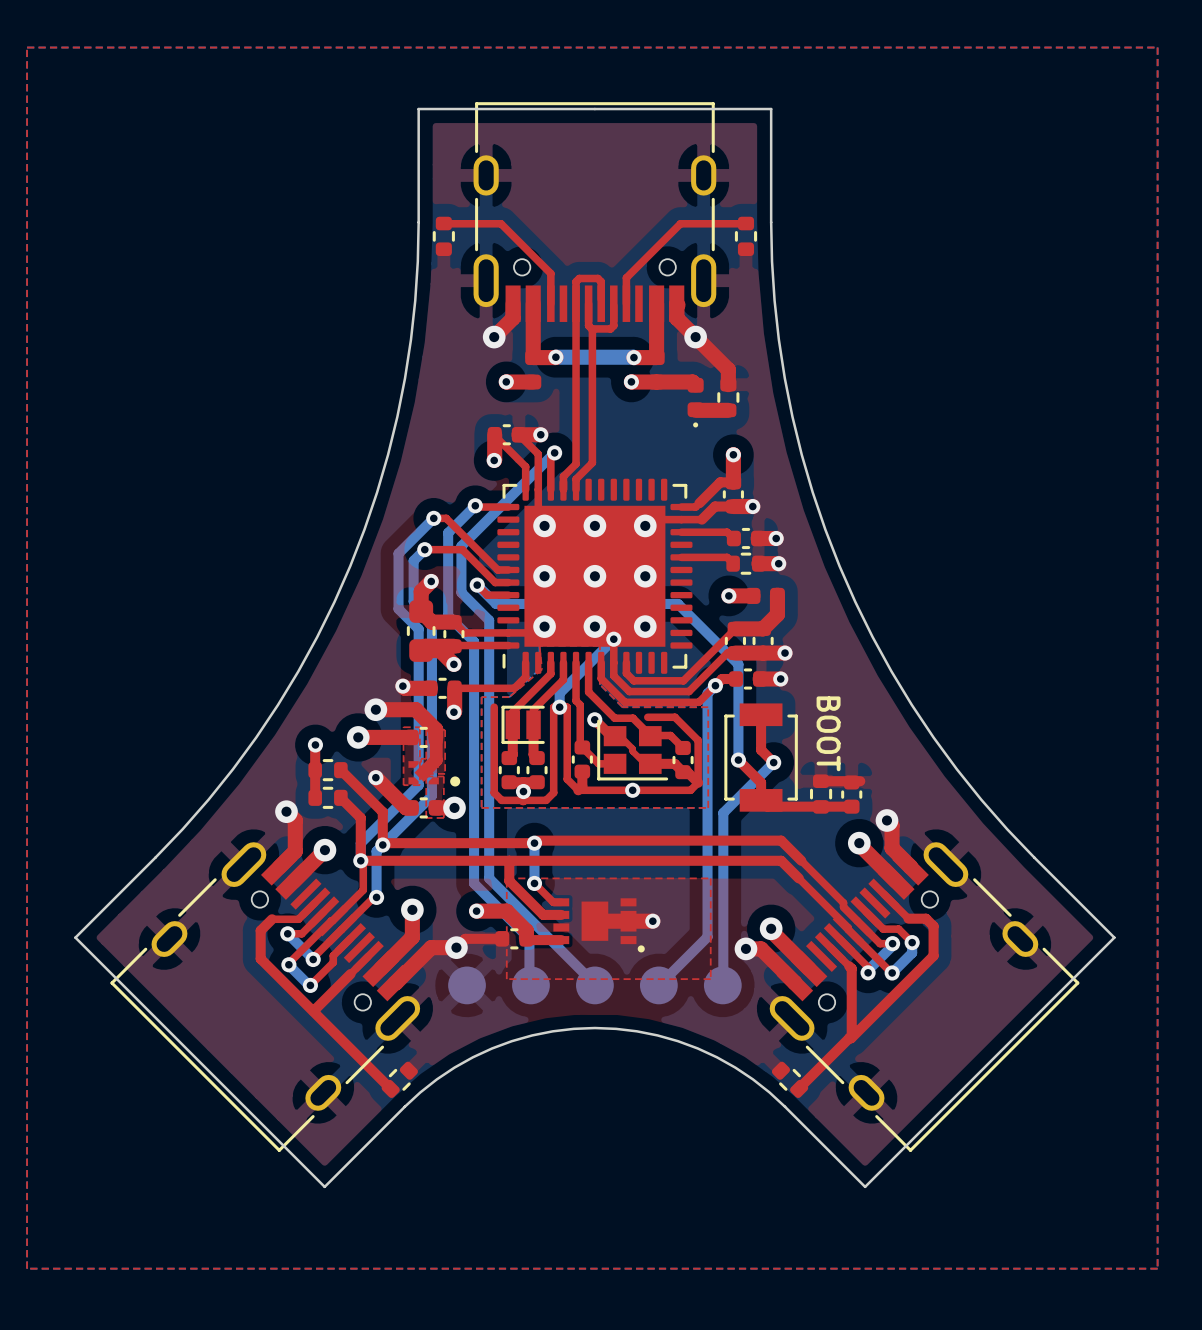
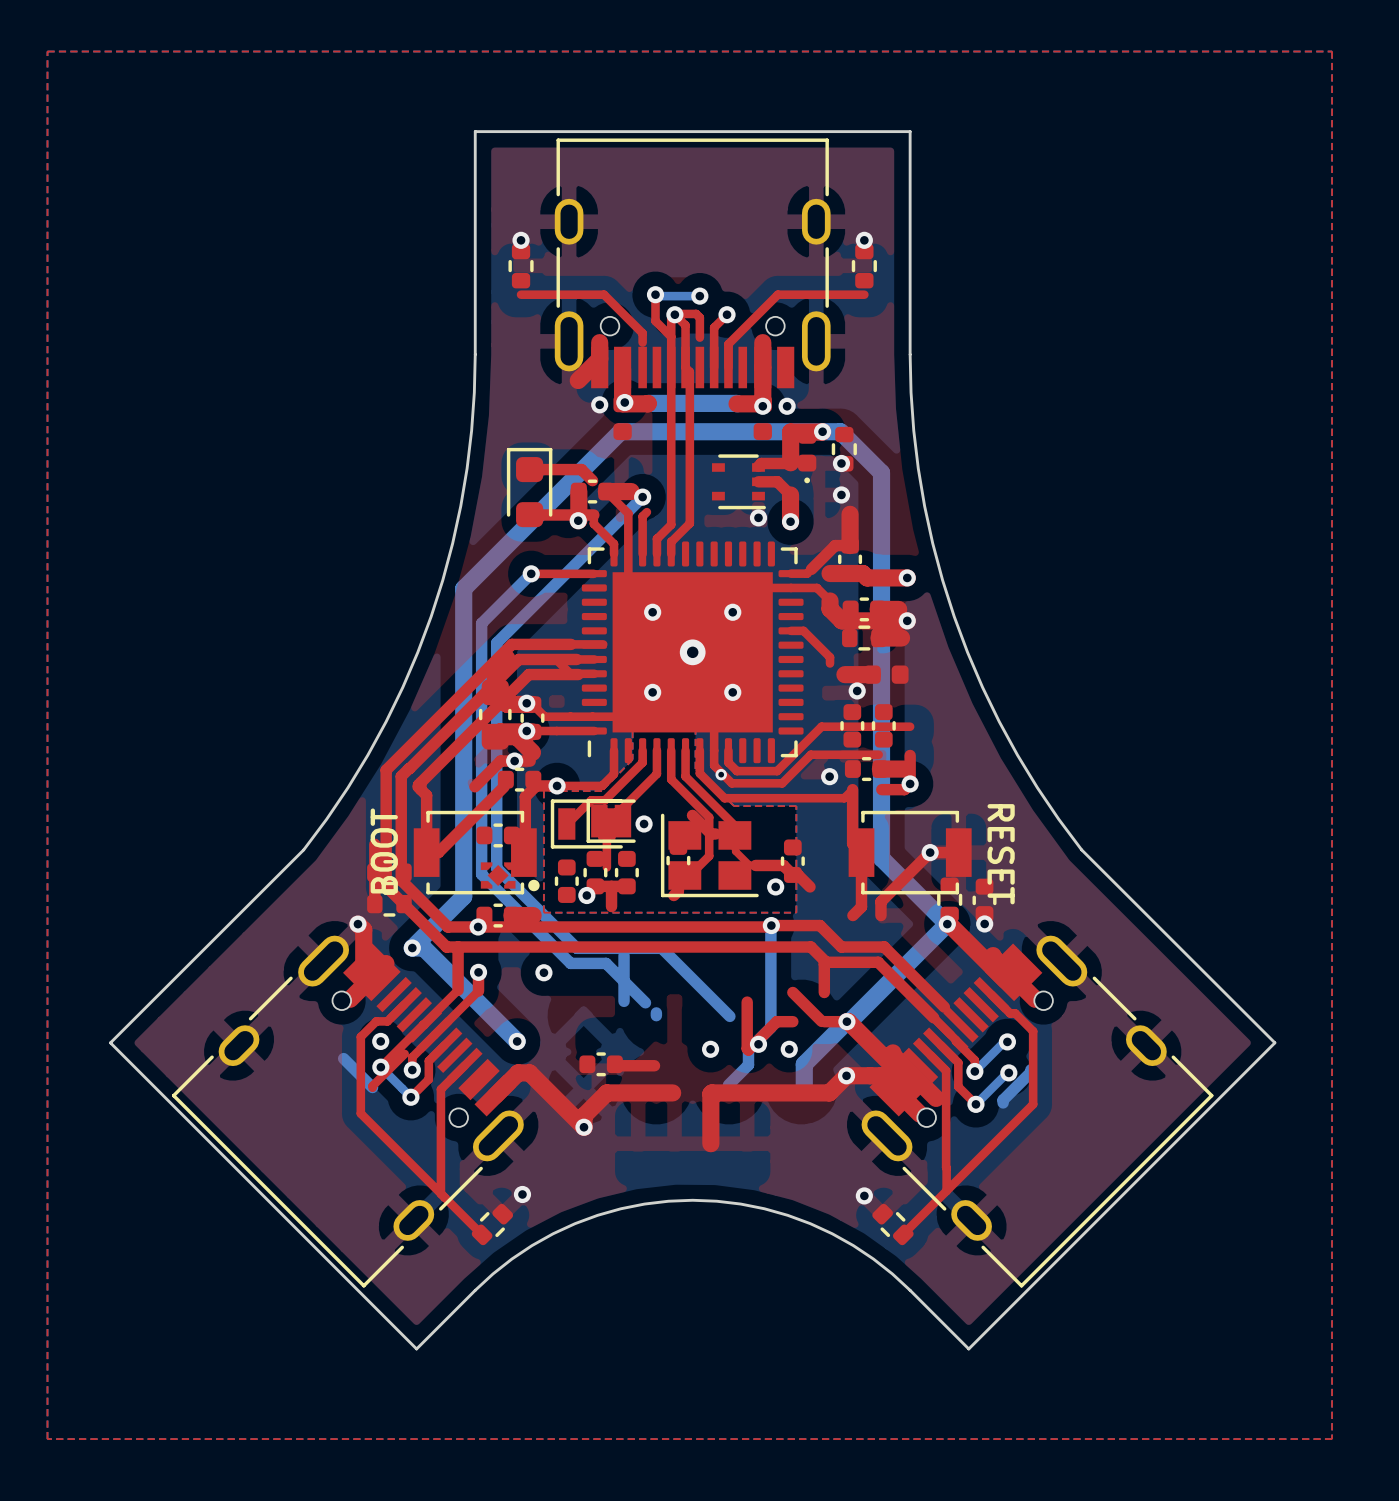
board edge: (418, 109) (771, 109) (772, 261) (778, 339) (792, 416) (801, 454) (825, 529) (839, 566) (872, 637) (891, 671) (911, 704) (956, 769) (1007, 829) (1114, 937) (865, 1186) (769, 1092) (735, 1067) (697, 1048) (657, 1035) (636, 1031) (594, 1028) (573, 1028) (532, 1035) (492, 1048) (454, 1067) (420, 1092) (324, 1186) (75, 937) (182, 829) (233, 769) (277, 704) (298, 671) (334, 601) (350, 566) (377, 492) (388, 454) (397, 416) (410, 339) (417, 261) (418, 109) -> (1081, 849) (1037, 787) (999, 721) (967, 652) (954, 616) (932, 543) (918, 468) (911, 392) (910, 131) (475, 131) (475, 354) (471, 430) (460, 506) (452, 543) (431, 616) (417, 652) (386, 721) (367, 755) (347, 787) (303, 849) (110, 1042) (416, 1348) (492, 1273) (511, 1259) (553, 1233) (597, 1215) (620, 1208) (644, 1204) (692, 1200) (740, 1204) (764, 1208) (810, 1223) (832, 1233) (873, 1259) (892, 1273) (968, 1348) (1274, 1042) (1081, 849)
part position: (594, 212) -> (692, 263)
via: none -> (521, 240)
via: none -> (864, 240)
top track: (443, 223) (501, 223) (550, 273) (550, 295) -> (521, 294) (604, 294) (642, 333)
top track: (745, 223) (680, 223) (626, 277) (626, 303) -> none
top track: none -> (655, 294) (655, 321) (671, 336)
bottom track: none -> (655, 294) (699, 296)
via: none -> (655, 294)
top track: none -> (864, 294) (777, 294) (728, 344) (728, 367)
via: none -> (699, 296)
top track: none -> (674, 314) (685, 325) (685, 342)
via: none -> (674, 314)
top track: none -> (727, 314) (714, 327) (714, 344)
via: none -> (727, 314)
top track: (678, 304) (676, 303) (676, 318) (728, 369) (728, 384) -> none
top track: (613, 325) (610, 328) (591, 328) -> none
via: (494, 337) -> none
via: (695, 337) -> none
via: none -> (624, 402)
via: (555, 357) -> none
via: (633, 357) -> none
via: none -> (599, 404)
via: none -> (762, 406)
via: none -> (787, 406)
via: (506, 381) -> none
via: (631, 381) -> none
top track: (506, 382) (533, 382) -> none
top track: (631, 382) (692, 382) (695, 384) -> none
top track: none -> (822, 432) (790, 432) (790, 462)
via: none -> (822, 431)
top track: none -> (790, 463) (761, 463) (758, 466)
top track: (695, 410) (728, 410) -> none
via: none -> (841, 463)
top track: none -> (529, 469) (581, 469) (592, 480)
part: none -> (738, 481)
top track: none -> (758, 481) (777, 481) (790, 494) (790, 521)
part: none -> (529, 487)
via: (540, 434) -> none
top track: (496, 437) (525, 466) (525, 480) -> (529, 515) (593, 515) (593, 523) (614, 544)
bottom track: none -> (642, 497) (496, 643) (496, 868) (576, 948) (661, 948) (729, 1016)
via: none -> (642, 497)
bottom track: (554, 452) (461, 546) (461, 592) (489, 620) (489, 878) (594, 984) -> none
via: (554, 452) -> none
via position: (733, 454) -> (841, 494)
via: none -> (758, 517)
via: none -> (790, 521)
top track: (475, 505) (508, 507) -> (531, 573) (593, 573)
bottom track: (475, 505) (448, 532) (448, 615) (474, 641) (474, 883) (529, 938) (529, 984) -> none
via: (475, 505) -> none
top track: none -> (830, 573) (862, 573) (867, 577) (907, 577)
top track: (752, 506) (715, 506) (701, 519) -> (907, 620) (841, 620) (830, 608) (830, 600) (817, 587) (814, 587)
via: (752, 506) -> none
bottom track: none -> (531, 573) (481, 623) (481, 874) (570, 963) (606, 963) (645, 1002)
via: none -> (531, 573)
via: none -> (907, 577)
top track: (433, 518) (446, 518) (497, 569) (508, 569) -> none
bottom track: (433, 518) (398, 553) (398, 609) (418, 629) (418, 785) (360, 843) (360, 860) -> none
via: (433, 518) -> none
via position: (544, 525) -> (652, 612)
via: (594, 525) -> none
via position: (645, 525) -> (732, 612)
top track: (681, 532) (727, 532) (733, 538) -> none
via: (776, 538) -> none
via: none -> (907, 620)
top track: (424, 549) (462, 549) (495, 582) -> (769, 926) (447, 926) (401, 880) (401, 776) (518, 659) (579, 659)
bottom track: (424, 549) (413, 560) (413, 601) (431, 619) (431, 795) (376, 851) (376, 897) -> none
via: (424, 549) -> none
top track: (692, 557) (727, 557) (733, 563) -> (803, 630) (830, 657) (830, 663)
via: (778, 563) -> none
top track: none -> (603, 644) (511, 644) (386, 770) (386, 886) (404, 904)
via: (544, 576) -> none
via: (645, 576) -> none
via: (431, 581) -> none
bottom track: (477, 585) (496, 603) (678, 603) (738, 664) (738, 760) -> none
via: (477, 585) -> none
top track: none -> (578, 674) (528, 674) (418, 786)
via position: (728, 595) -> (857, 690)
top track: (777, 595) (777, 614) (763, 628) -> none
via: none -> (526, 703)
via position: (544, 626) -> (652, 692)
via: (594, 626) -> none
via position: (645, 626) -> (732, 692)
top track: (762, 628) (735, 628) (683, 680) (669, 680) -> (910, 726) (821, 726) (777, 771)
bottom track: (613, 639) (559, 693) (559, 707) -> none
via: (613, 639) -> none
via: none -> (526, 731)
top zone outline: (542, 645) (539, 645) (542, 669) (509, 697) (481, 697) (481, 807) (708, 807) (708, 707) (622, 707) (599, 684) (599, 645) (597, 645) -> (632, 731) (632, 759) (601, 791) (543, 791) (543, 912) (796, 912) (796, 806) (734, 806) (695, 768) (695, 731)
top track: (785, 653) (727, 653) (689, 691) (673, 691) -> (878, 754) (810, 754) (782, 783)
via: (785, 653) -> none
via: (453, 664) -> none
top track: none -> (910, 755) (910, 783) (904, 789) (881, 789)
via: none -> (514, 761)
top track: none -> (530, 761) (500, 761) (474, 786)
top track: (550, 673) (512, 711) (512, 754) (509, 758) -> (642, 762) (604, 800) (591, 800) (566, 824)
top track: (525, 676) (514, 688) (454, 688) (453, 712) -> (614, 766) (614, 773) (602, 785) (536, 785) (525, 796) (525, 851)
top track: (601, 678) (624, 702) (698, 702) (722, 679) (735, 679) -> (699, 768) (699, 773) (724, 798) (844, 798) (852, 789)
top track: (563, 679) (533, 709) (533, 754) (537, 758) -> (656, 769) (656, 773) (606, 823) (606, 867)
via position: (780, 679) -> (910, 783)
via: none -> (721, 774)
top track: (588, 685) (588, 692) (614, 718) (633, 718) (650, 735) (670, 735) (683, 747) -> (685, 776) (735, 826) (735, 834)
bottom track: (715, 685) (707, 693) (707, 937) (657, 986) -> none
top track: (402, 686) (405, 688) (430, 688) -> none
via: (402, 686) -> none
top track: (576, 688) (576, 700) (580, 705) (580, 745) (598, 763) (615, 763) -> (671, 779) (709, 817) (709, 856) (689, 875)
via: none -> (557, 785)
top track: none -> (418, 786) (426, 795) (426, 852) (438, 852) (504, 786)
top track: none -> (852, 789) (852, 843) (861, 852) (861, 906) (852, 915)
top track: (494, 707) (494, 792) (501, 800) (546, 800) (553, 792) (553, 707) (567, 707) (567, 779) (578, 790) (690, 790) (698, 782) (698, 740) (674, 717) (647, 717) -> none
via: (559, 707) -> none
top track: (375, 709) (415, 709) (435, 729) (435, 737) -> none
via: (375, 709) -> none
via: (453, 712) -> none
top track: (761, 714) (761, 750) (773, 762) -> none
via: (594, 719) -> none
part footprint: [597, 719, 669, 781] -> [660, 813, 759, 898]
top zone outline: (403, 727) (403, 785) (419, 785) (419, 727) (403, 727) -> none
part: none -> (586, 823)
via: none -> (644, 823)
top zone outline: (426, 729) (426, 758) (421, 758) (421, 773) (445, 773) (445, 729) (426, 729) -> none
text rotation: 0° (828, 733) -> 180° (384, 850)
text position: BOOT (828, 733) -> BOOT (384, 850)
top track: (358, 737) (411, 737) -> none
via: (358, 737) -> none
top track: (436, 737) (436, 760) (423, 772) -> none
via: (315, 744) -> none
part: none -> (475, 852)
top track: none -> (958, 852) (930, 852) (880, 901) (880, 915)
text: none -> RESET (1001, 854)
part rotation: 0° (761, 757) -> 90° clockwise (910, 852)
top track: (738, 760) (761, 782) (761, 800) (767, 806) (851, 806) -> none
via: (738, 760) -> none
bottom track: (773, 762) (723, 812) (723, 984) -> none
via position: (773, 762) -> (930, 852)
top track: (340, 770) (382, 812) (382, 844) -> none
top zone outline: (426, 776) (426, 817) (443, 817) (443, 776) (426, 776) -> none
top track: (375, 777) (406, 807) (411, 807) -> none
via: (375, 777) -> none
part: none -> (566, 881)
top track: (821, 781) (860, 781) -> none
via: none -> (775, 886)
via: (632, 790) -> none
via position: (523, 791) -> (586, 895)
via size: [275, 800, 298, 824] -> [349, 915, 367, 933]
via: (454, 807) -> none
top track: (286, 811) (295, 820) (295, 851) (279, 867) -> none
top track: none -> (357, 924) (363, 929) (363, 964)
top track: none -> (947, 924) (1005, 980)
via: none -> (947, 924)
via: none -> (984, 923)
top track: none -> (771, 925) (820, 925) (841, 947) (884, 947)
via: none -> (771, 925)
top track: (360, 817) (360, 860) -> (426, 926) (446, 947) (810, 947) (826, 962)
via: none -> (478, 926)
bottom track: none -> (770, 926) (770, 1027) (748, 1050) (748, 1065) (728, 1085)
top track: (886, 820) (892, 825) (892, 848) (910, 867) -> none
via: (886, 820) -> none
top track: none -> (884, 947) (944, 1007)
via: none -> (412, 948)
top track: (537, 840) (781, 840) (843, 902) (843, 907) (880, 943) (892, 943) -> none
top track: (534, 843) (384, 843) (382, 844) -> none
via: (534, 843) -> none
via: (859, 843) -> none
via: (382, 844) -> none
top track: none -> (826, 962) (878, 962) (950, 1034)
top track: none -> (826, 962) (824, 964) (824, 992)
via: (324, 850) -> none
top track: none -> (478, 972) (478, 991) (412, 1057) (412, 1070)
via: none -> (478, 972)
via: none -> (543, 972)
via: (360, 860) -> none
top track: (509, 860) (509, 880) (543, 914) (561, 914) -> none
top track: none -> (458, 991) (458, 947) (458, 990) (424, 1023) (424, 1024) (380, 1067)
top track: none -> (792, 992) (821, 1021)
top track: none -> (991, 994) (1010, 1013) (1015, 1013) (1033, 1031) (1033, 1104) (903, 1233)
top zone outline: (506, 878) (506, 979) (710, 979) (710, 878) (506, 878) -> none
top track: (534, 883) (553, 902) (561, 902) -> none
via: (534, 883) -> none
top track: none -> (747, 1002) (748, 1050) (776, 1021) (792, 1021)
top track: none -> (404, 1004) (387, 1021) (376, 1021) (360, 1036) (360, 1113) (482, 1234)
bottom track: none -> (656, 1012) (656, 1015)
top track: (883, 894) (908, 918) (926, 918) (933, 926) (933, 955) (849, 1038) -> none
top track: (376, 897) (373, 897) (341, 929) -> none
via: (376, 897) -> none
top track: none -> (824, 1021) (848, 1021) (906, 1079)
via: none -> (846, 1021)
top track: (314, 902) (298, 919) (275, 919) -> none
top track: (412, 909) (412, 937) (380, 968) -> none
via: (412, 909) -> none
top track: (323, 911) (301, 933) (287, 933) -> none
top track: (476, 911) (506, 911) (526, 931) (526, 938) -> none
via: (476, 911) -> none
top track: (866, 911) (883, 929) (898, 929) (912, 942) -> none
top track: none -> (955, 1040) (974, 1060) (974, 1071)
via: none -> (380, 1041)
bottom track: none -> (517, 1041) (423, 948) (412, 948) (463, 896) (463, 588) (620, 431) (840, 431) (881, 472) (881, 858) (947, 924) (804, 1064) (804, 1087)
via: none -> (517, 1041)
top track: (272, 919) (260, 930) (260, 958) (390, 1088) -> none
bottom track: none -> (1007, 1041) (1004, 1041) (974, 1071)
via: none -> (1007, 1041)
top track: none -> (444, 1045) (428, 1060) (428, 1079) (410, 1097)
top track: (594, 921) (652, 921) -> none
top track: none -> (940, 1045) (958, 1062) (958, 1086) (975, 1104)
part: (599, 925) -> none
via: none -> (710, 1049)
via: none -> (789, 1049)
via: (771, 928) -> none
top track: none -> (930, 1055) (946, 1070) (946, 1190)
via: (287, 933) -> none
top track: (350, 938) (333, 955) (333, 962) (310, 985) -> none
top track: (502, 938) (465, 938) (456, 947) (431, 947) (394, 983) -> none
top track: (839, 938) (868, 967) (868, 972) -> none
top track: none -> (464, 1065) (440, 1089) (440, 1193)
bottom track: none -> (380, 1067) (410, 1097)
via: none -> (380, 1067)
bottom track: (912, 942) (912, 953) (892, 972) -> none
via: (912, 942) -> none
via: none -> (412, 1070)
via: (892, 943) -> none
via: none -> (974, 1071)
bottom track: none -> (1008, 1072) (975, 1104)
via: none -> (1008, 1072)
via: (456, 947) -> none
top track: (830, 947) (851, 968) (851, 1035) (798, 1088) -> none
top track: none -> (864, 1075) (846, 1075) (829, 1092) (711, 1092) (710, 1143)
via position: (745, 948) -> (846, 1075)
top track: (368, 956) (313, 1011) -> none
via: (313, 959) -> none
top track: (288, 964) (363, 890) (363, 860) (781, 860) (891, 972) -> none
bottom track: (288, 964) (310, 985) -> none
via: (288, 964) -> none
top track: none -> (672, 1092) (606, 1092) (583, 1115) (583, 1127) (529, 1072) (518, 1072) (495, 1095)
via: none -> (410, 1097)
via: (868, 972) -> none
via: (892, 972) -> none
via: none -> (975, 1104)
via: (310, 985) -> none
part: (594, 985) -> none
via: none -> (583, 1127)
part position: (265, 997) -> (347, 1111)
part position: (924, 997) -> (1037, 1111)
via: none -> (522, 1194)
via: none -> (864, 1195)
part position: (399, 1079) -> (492, 1224)
part position: (790, 1079) -> (892, 1224)

